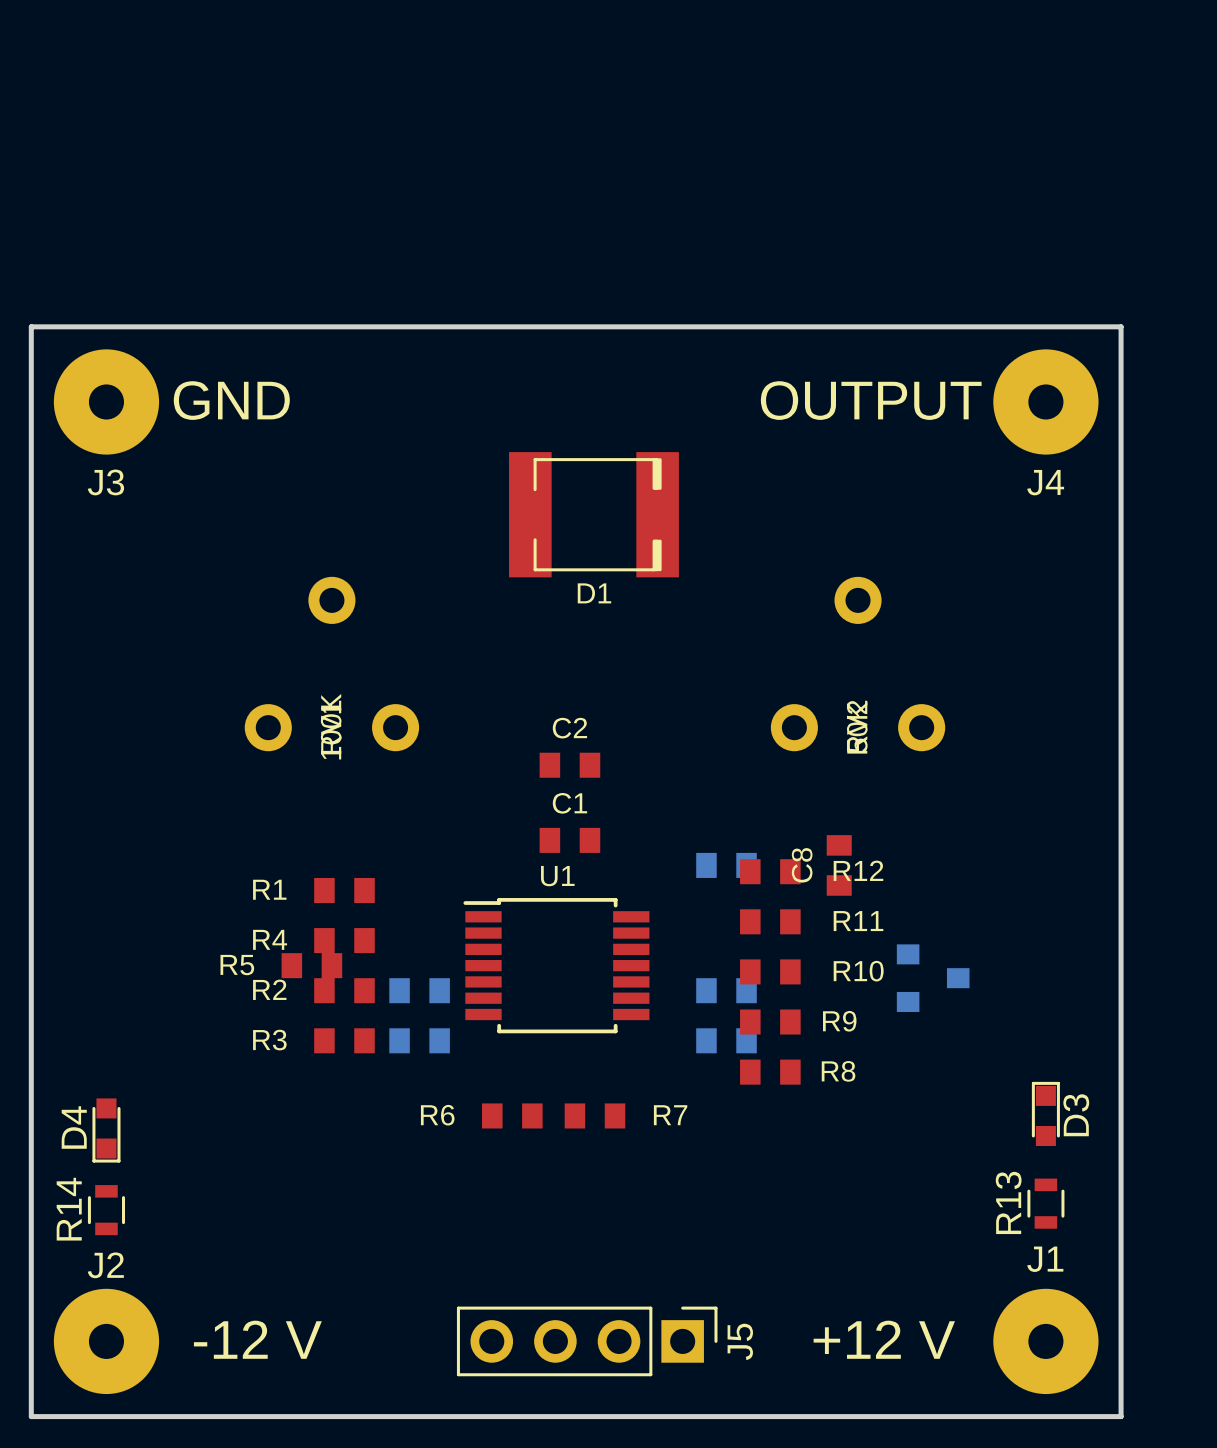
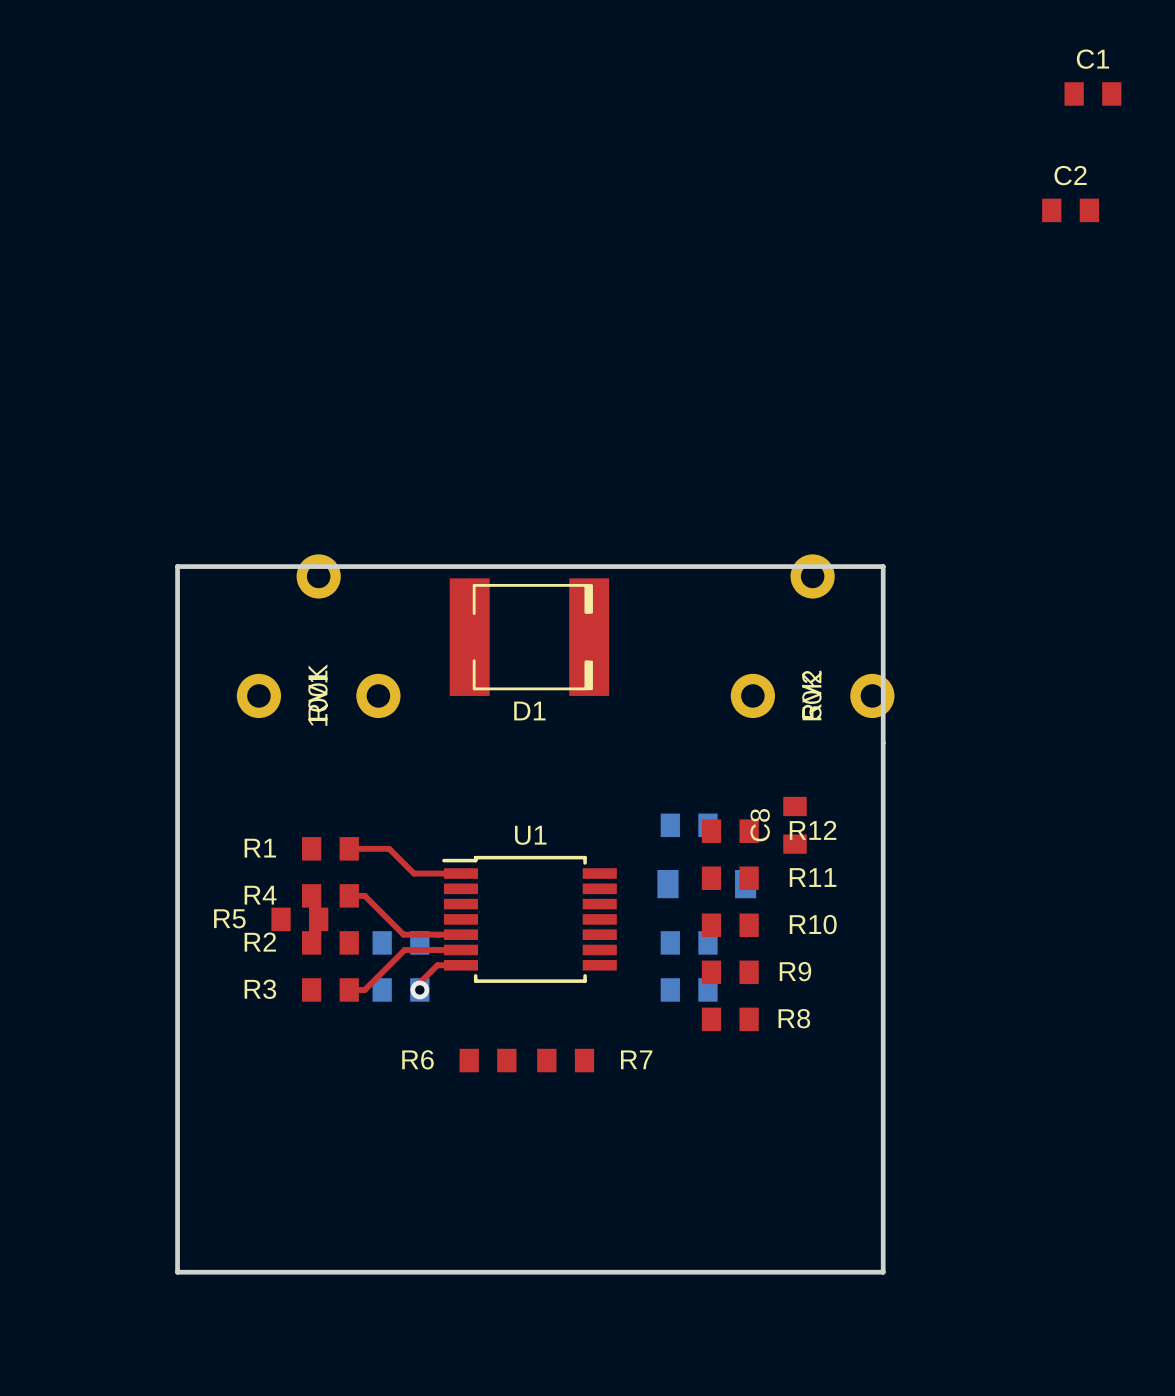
board edge: (31, 326) (31, 1416) (1121, 1416) (1121, 326) (31, 326) -> none
text: GND (231, 400) -> none
text: OUTPUT (871, 400) -> none
J3: (106, 401) -> none
J4: (1045, 401) -> none
D1 position: (593, 514) -> (529, 637)
board edge: none -> (177, 566) (177, 1272) (883, 1272) (883, 566) (177, 566)
C2 position: (569, 765) -> (1070, 210)
C1 position: (569, 840) -> (1092, 93)
top track: none -> (349, 848) (389, 848) (413, 873) (460, 873)
part: none -> (706, 884)
top track: none -> (349, 895) (364, 895) (403, 934) (460, 934)
part: (933, 978) -> none
top track: none -> (460, 949) (404, 949) (364, 989) (349, 989)
top track: none -> (460, 965) (437, 965) (419, 982) (419, 989)
via: none -> (419, 989)
D3: (1045, 1113) -> none
D4: (106, 1130) -> none
R13: (1045, 1203) -> none
R14: (106, 1210) -> none
text: -12 V (257, 1339) -> none
text: +12 V (884, 1339) -> none
J2: (106, 1341) -> none
J5: (587, 1341) -> none
J1: (1045, 1341) -> none

